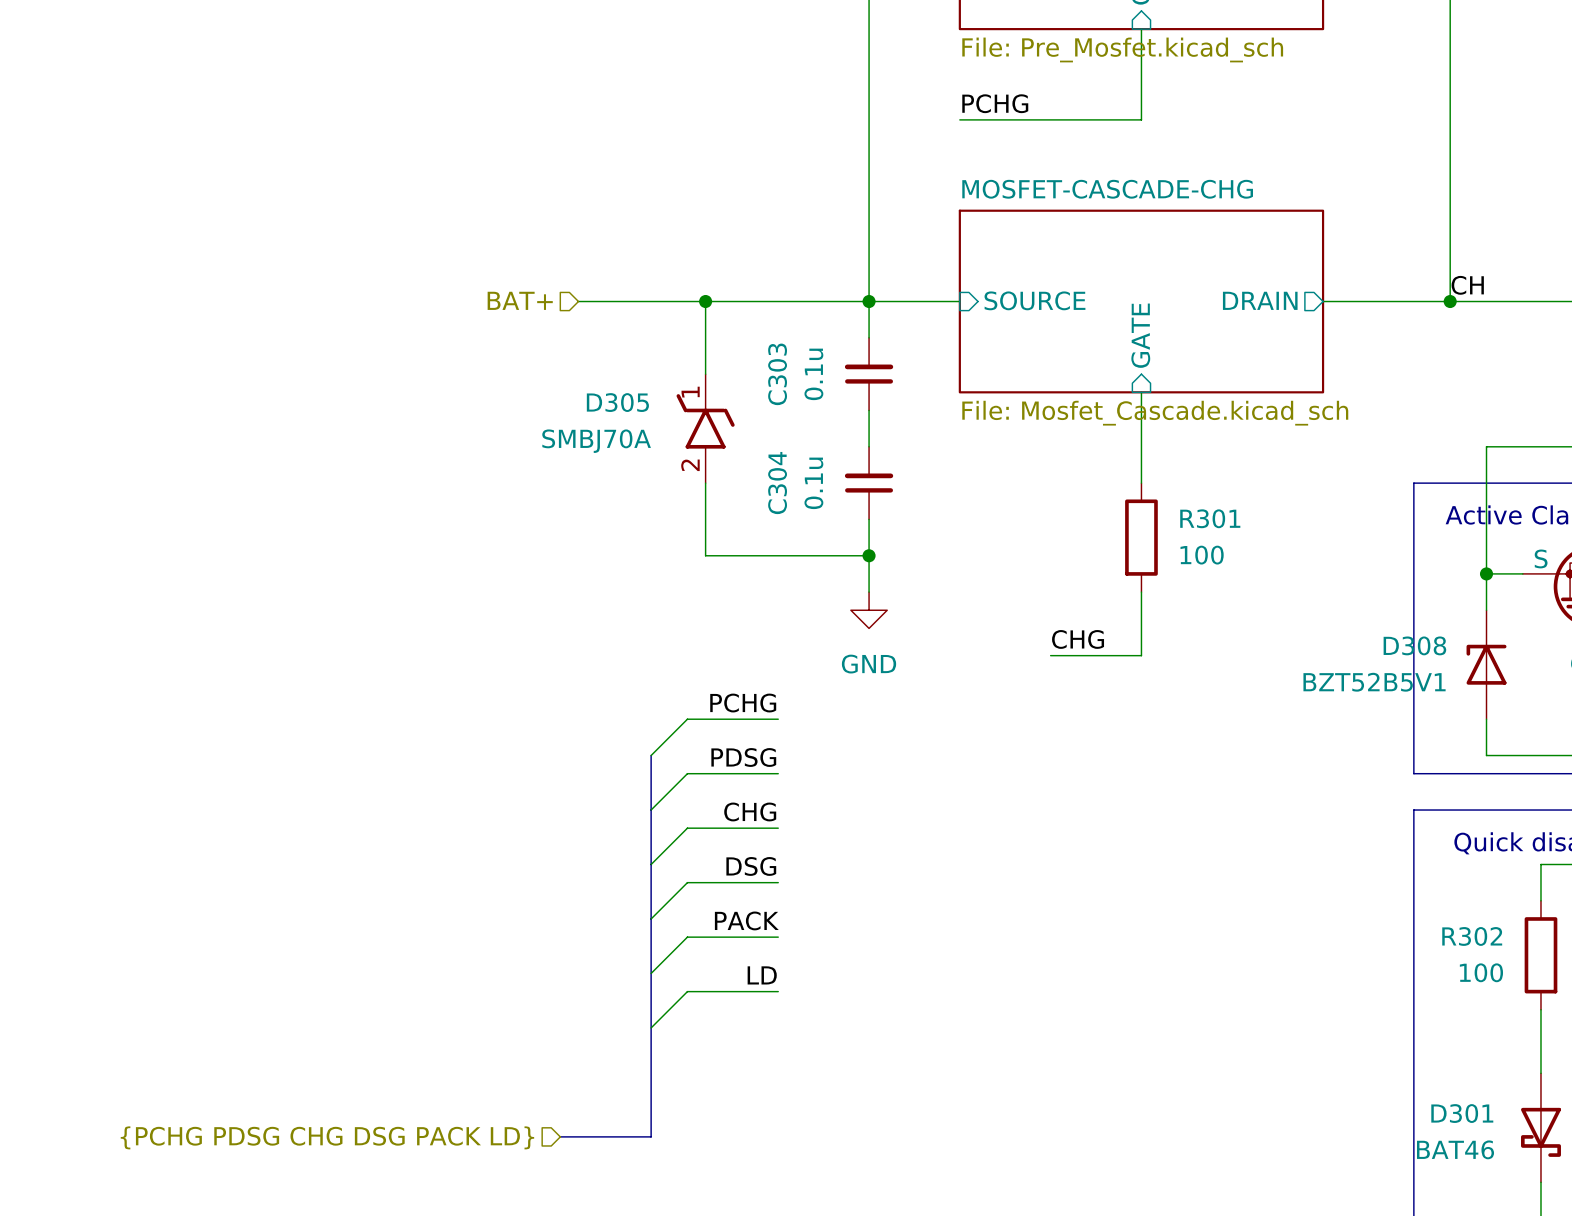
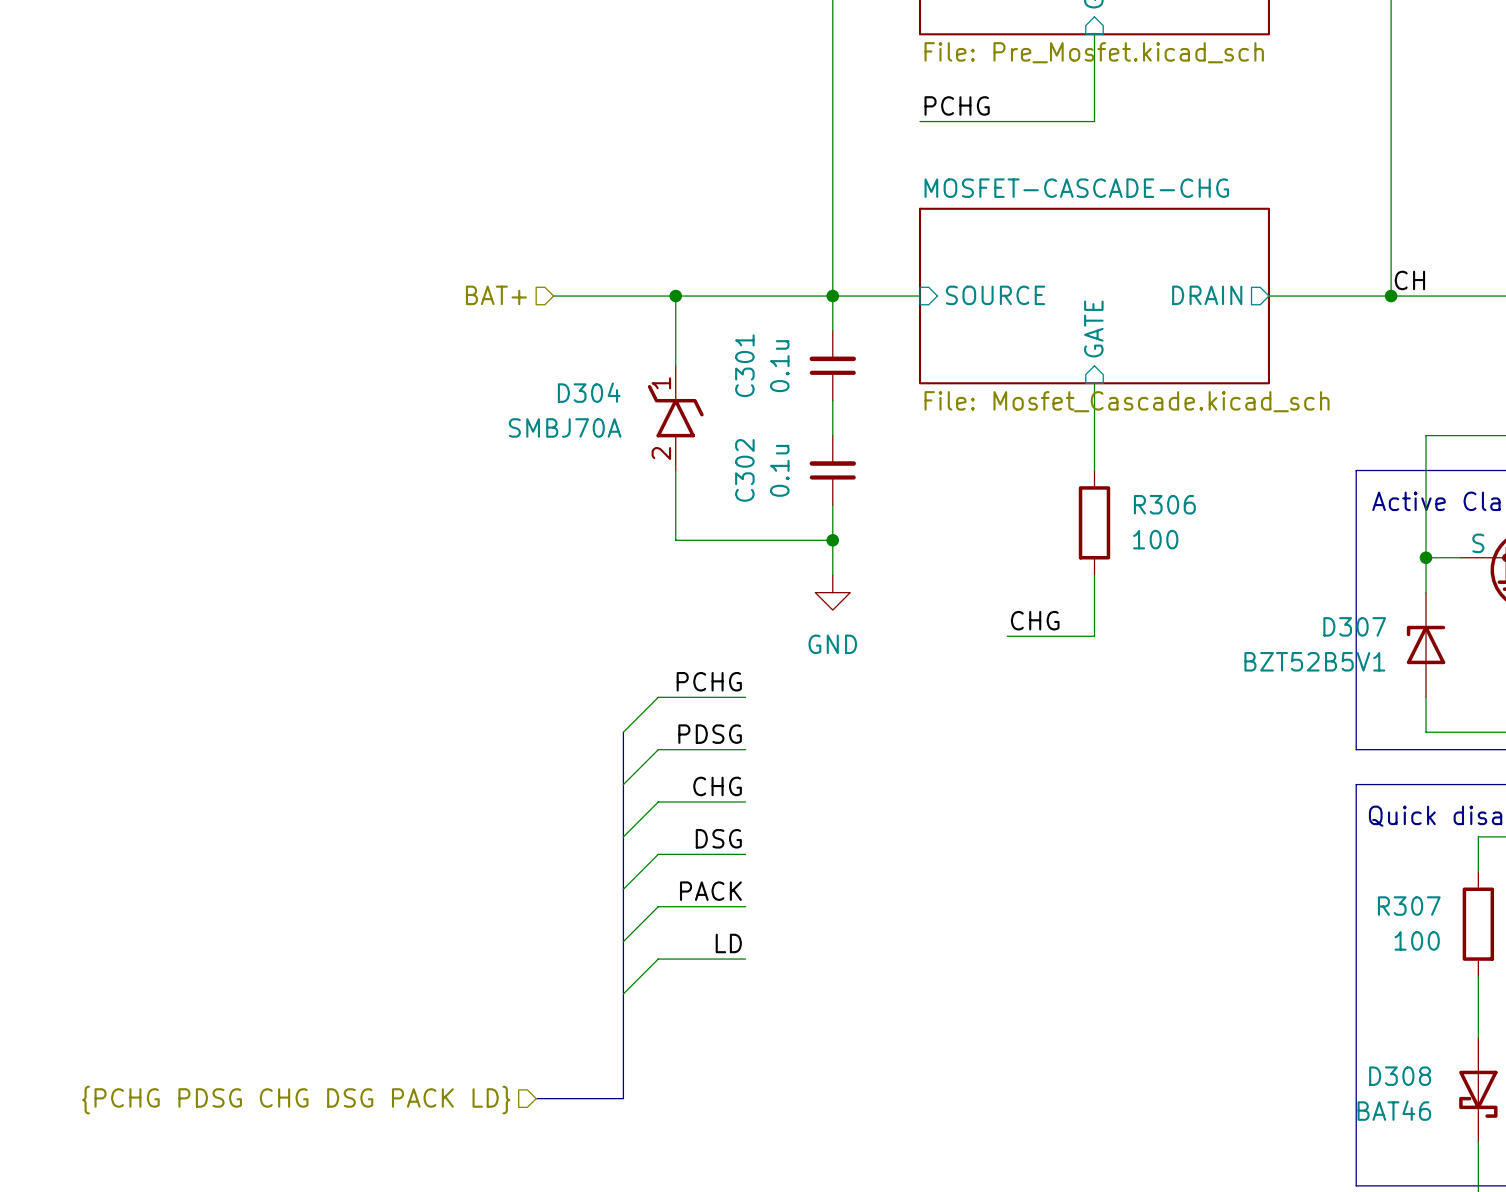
C303 name: C303 (777, 374) -> C301 (744, 365)
D305 name: D305 (617, 402) -> D304 (589, 392)
C304 name: C304 (777, 483) -> C302 (744, 470)
R301 name: R301 (1210, 518) -> R306 (1164, 504)
D308 name: D308 (1414, 645) -> D307 (1354, 626)
R302 name: R302 (1472, 936) -> R307 (1409, 906)
D301 name: D301 (1462, 1113) -> D308 (1400, 1076)

